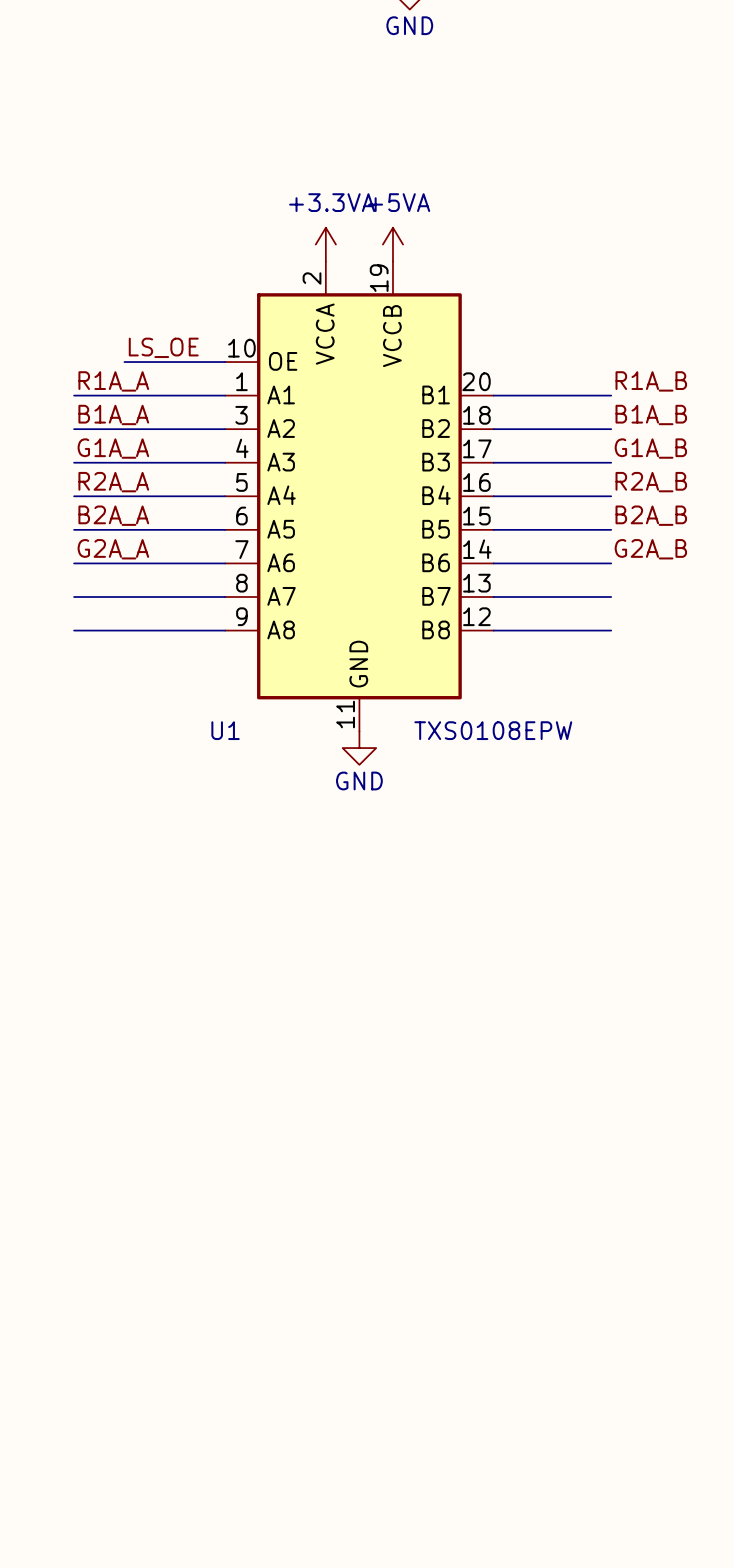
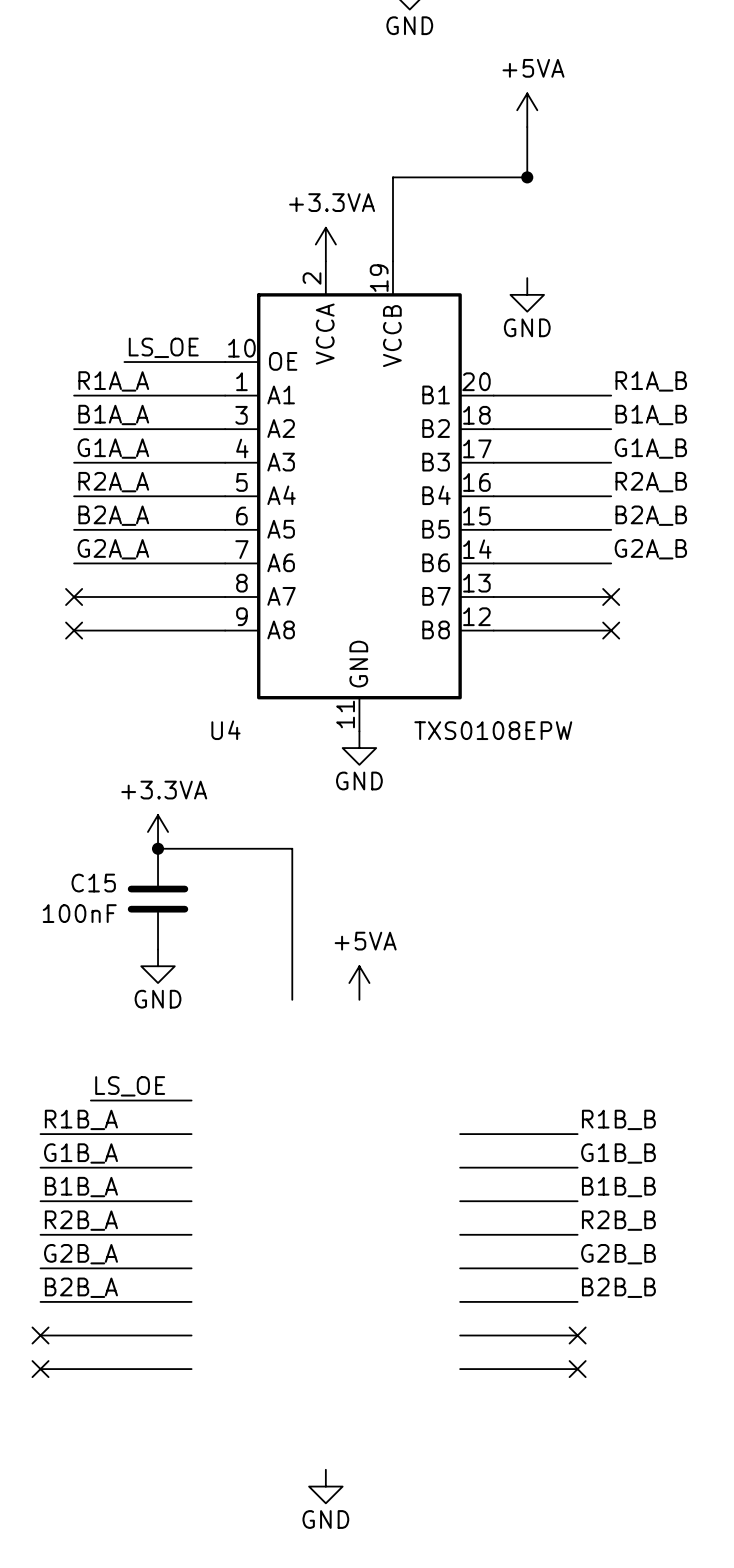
wire: none -> (527, 127) (527, 177) (392, 177) (392, 261)
junction: none -> (527, 177)
power symbol position: +5VA (392, 244) -> +5VA (527, 110)
power symbol: none -> GND (527, 294)
no-connect mark: none -> (74, 597)
no-connect mark: none -> (611, 597)
no-connect mark: none -> (74, 630)
no-connect mark: none -> (611, 630)
U1 name: U1 (225, 730) -> U4 (225, 730)
power symbol: none -> +3.3VA (158, 831)
wire: none -> (158, 848) (292, 848) (292, 999)
junction: none -> (158, 848)
C15: none -> 100nF (158, 899)
power symbol: none -> GND (158, 966)
power symbol: none -> +5VA (359, 983)
label: none -> LS_OE (130, 1086)
wire: none -> (90, 1100) (191, 1100)
label: none -> R1B_A (81, 1119)
label: none -> R1B_B (618, 1119)
wire: none -> (40, 1134) (191, 1134)
wire: none -> (460, 1134) (577, 1134)
label: none -> G1B_A (81, 1153)
label: none -> G1B_B (618, 1153)
wire: none -> (40, 1167) (191, 1167)
wire: none -> (460, 1167) (577, 1167)
label: none -> B1B_A (81, 1187)
label: none -> B1B_B (618, 1187)
wire: none -> (40, 1201) (191, 1201)
wire: none -> (460, 1201) (577, 1201)
label: none -> R2B_A (81, 1220)
label: none -> R2B_B (618, 1220)
wire: none -> (40, 1234) (191, 1234)
wire: none -> (460, 1234) (577, 1234)
label: none -> G2B_A (81, 1254)
label: none -> G2B_B (618, 1254)
wire: none -> (40, 1268) (191, 1268)
wire: none -> (460, 1268) (577, 1268)
label: none -> B2B_A (81, 1287)
label: none -> B2B_B (618, 1287)
wire: none -> (40, 1301) (191, 1301)
wire: none -> (460, 1301) (577, 1301)
wire: none -> (40, 1335) (191, 1335)
no-connect mark: none -> (40, 1335)
wire: none -> (460, 1335) (577, 1335)
no-connect mark: none -> (577, 1335)
wire: none -> (40, 1369) (191, 1369)
no-connect mark: none -> (40, 1369)
wire: none -> (460, 1369) (577, 1369)
no-connect mark: none -> (577, 1369)
power symbol: none -> GND (325, 1486)

